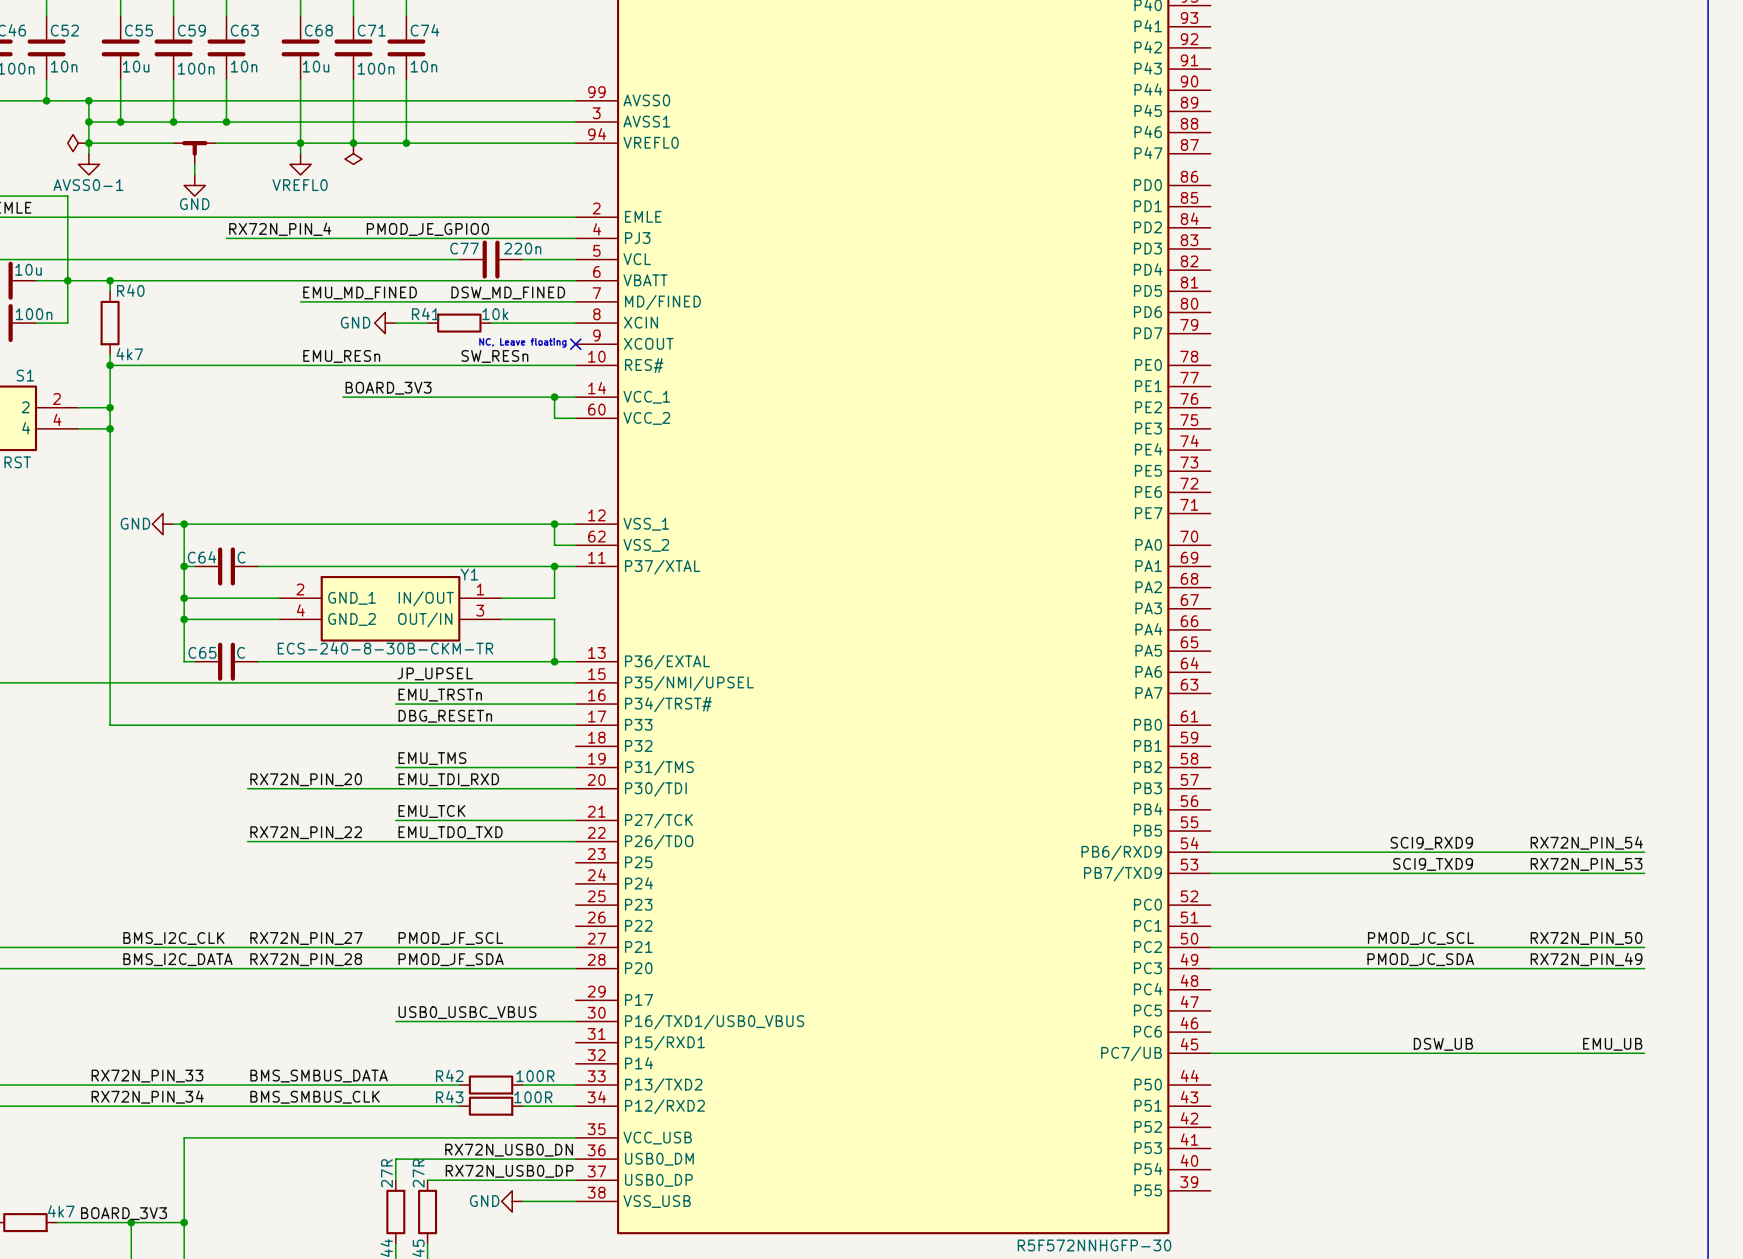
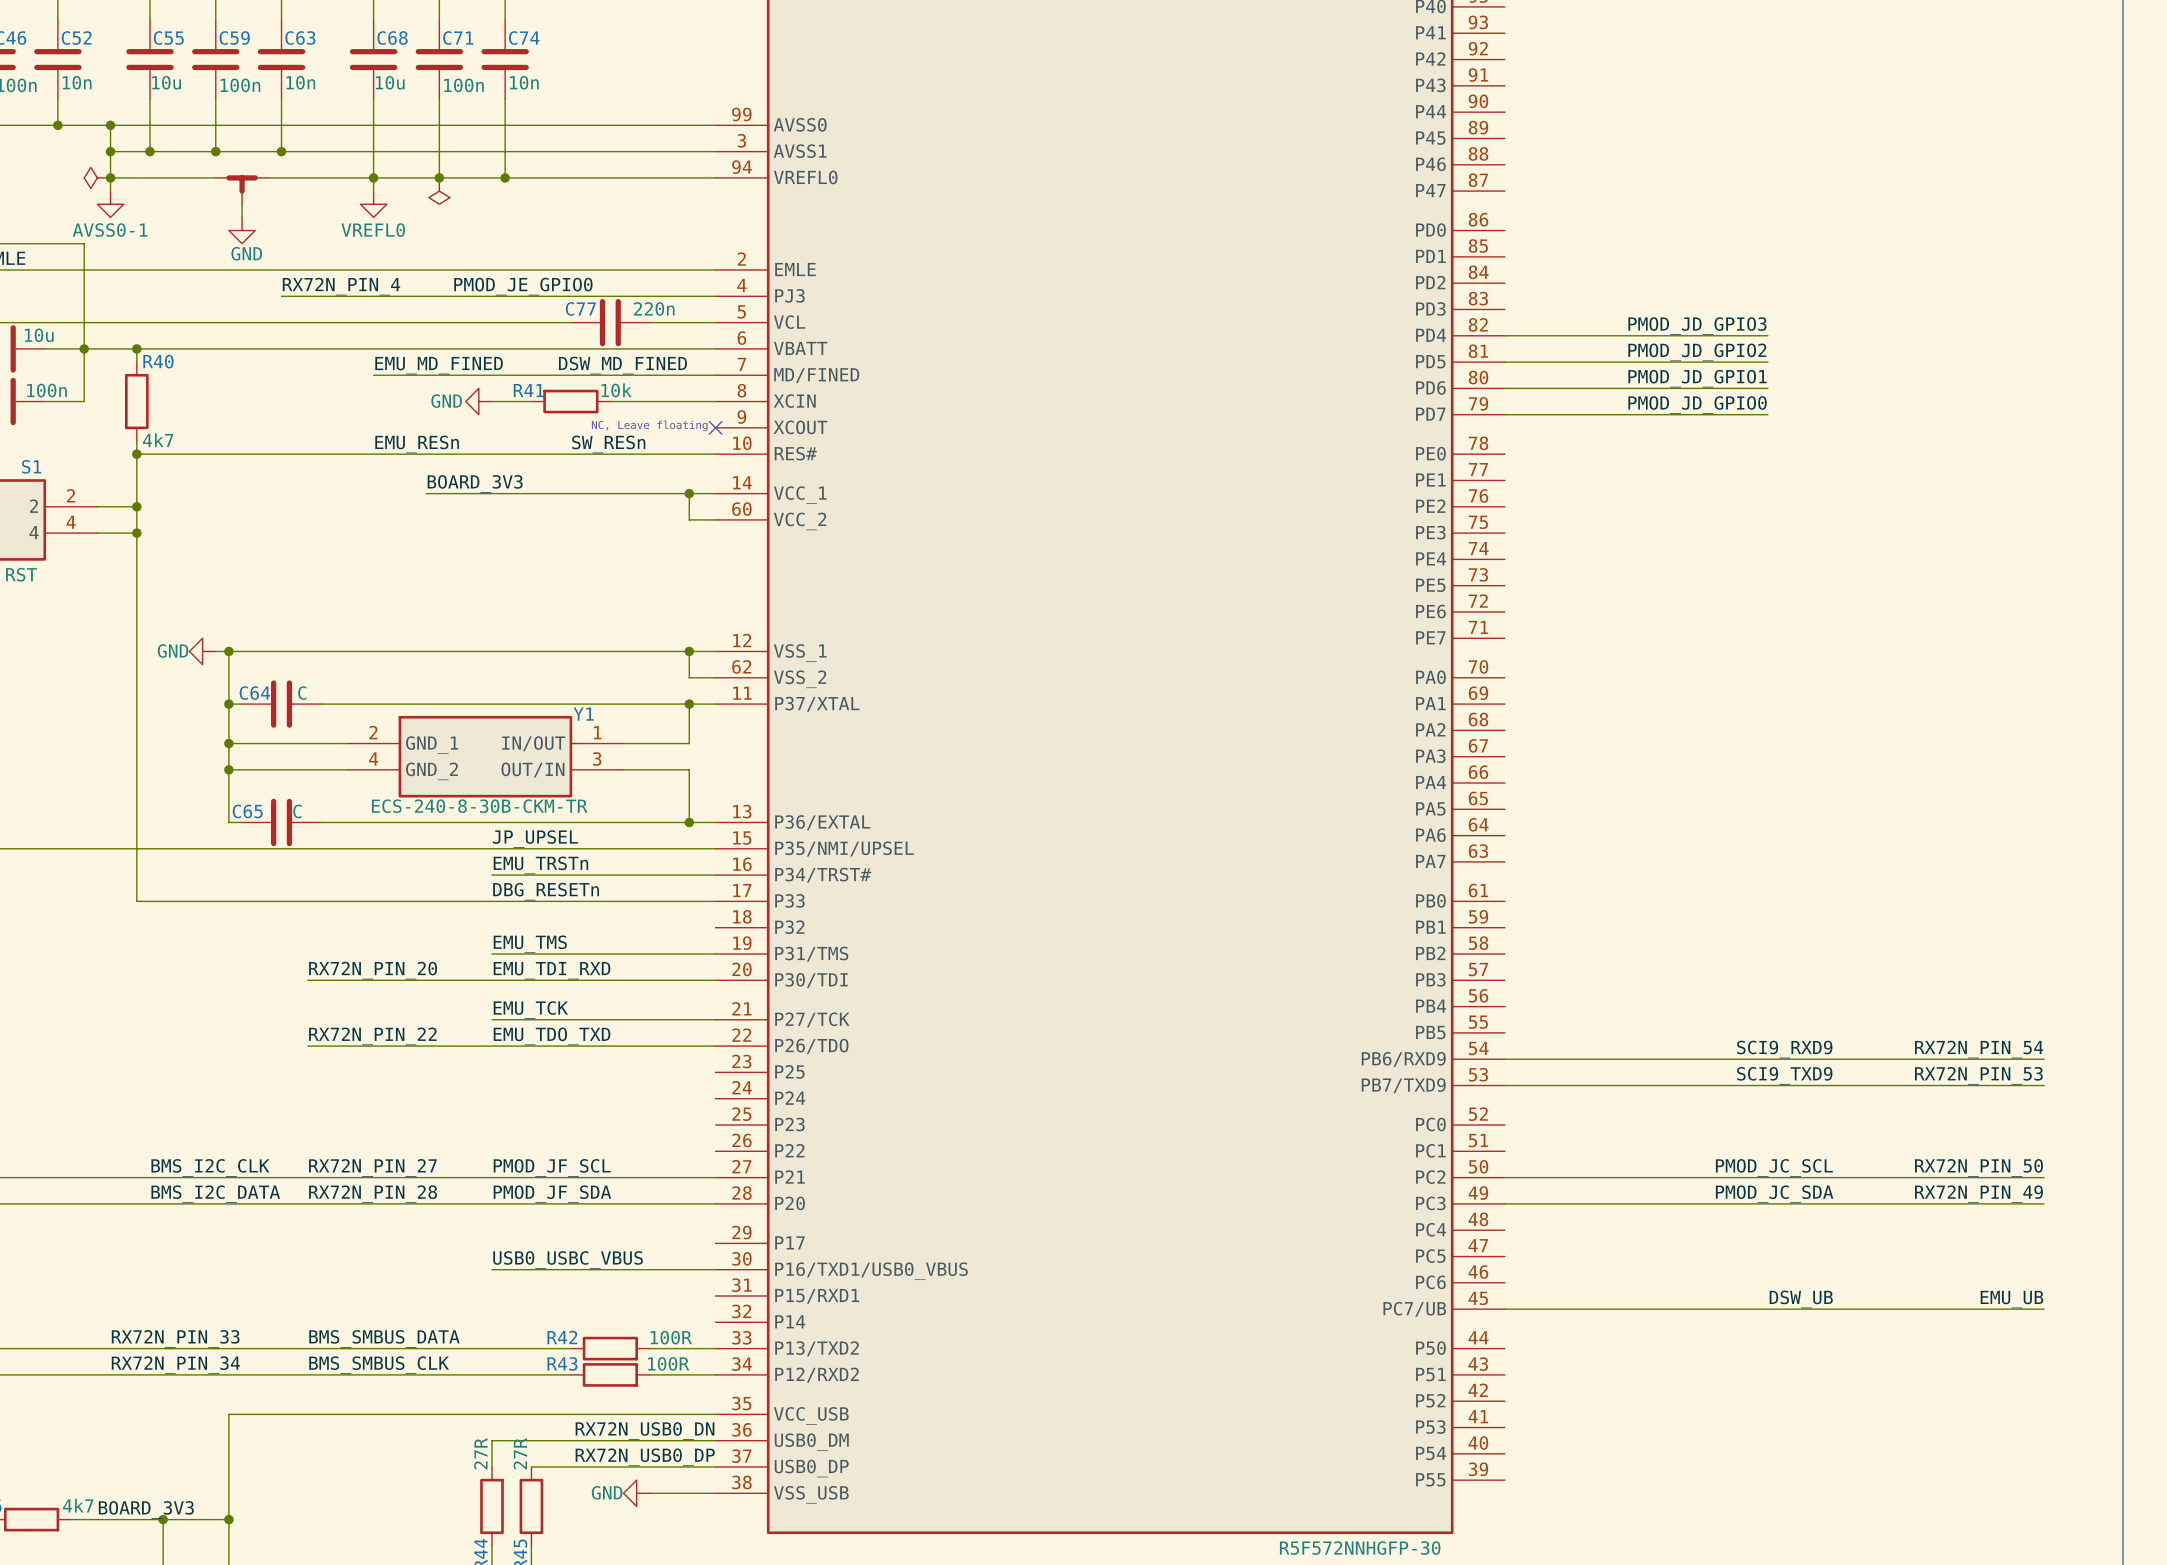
label: none -> PMOD_JD_GPIO3 (1697, 326)
wire: none -> (1504, 335) (1767, 335)
label: none -> PMOD_JD_GPIO2 (1697, 352)
wire: none -> (1504, 362) (1767, 362)
label: none -> PMOD_JD_GPIO1 (1697, 378)
wire: none -> (1504, 388) (1767, 388)
label: none -> PMOD_JD_GPIO0 (1697, 404)
wire: none -> (1504, 414) (1767, 414)

